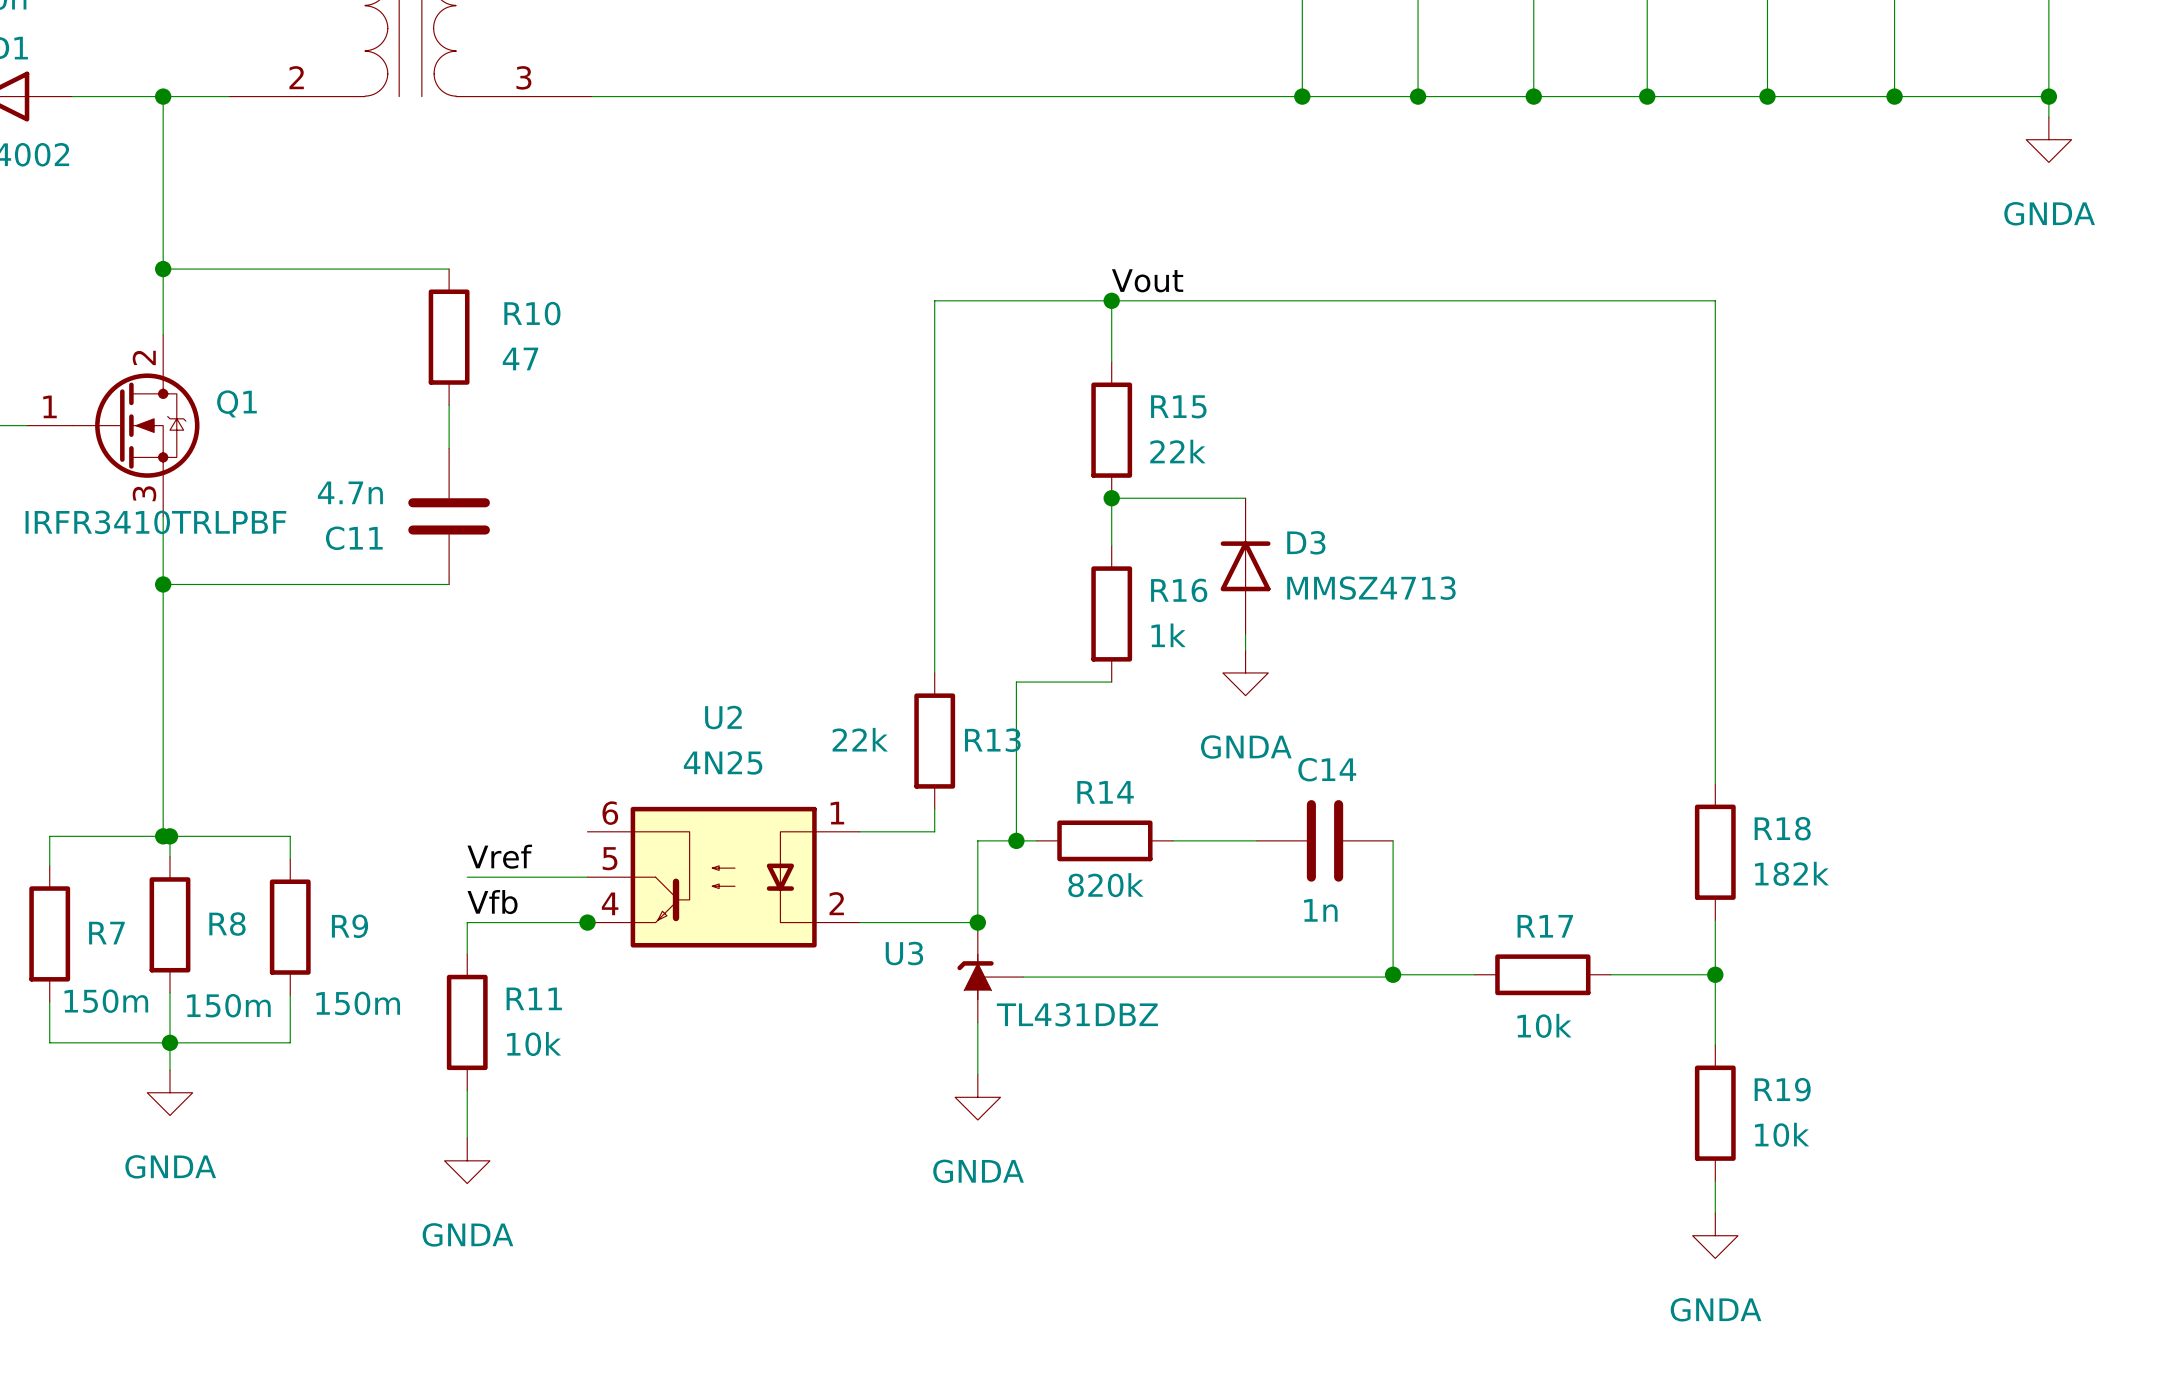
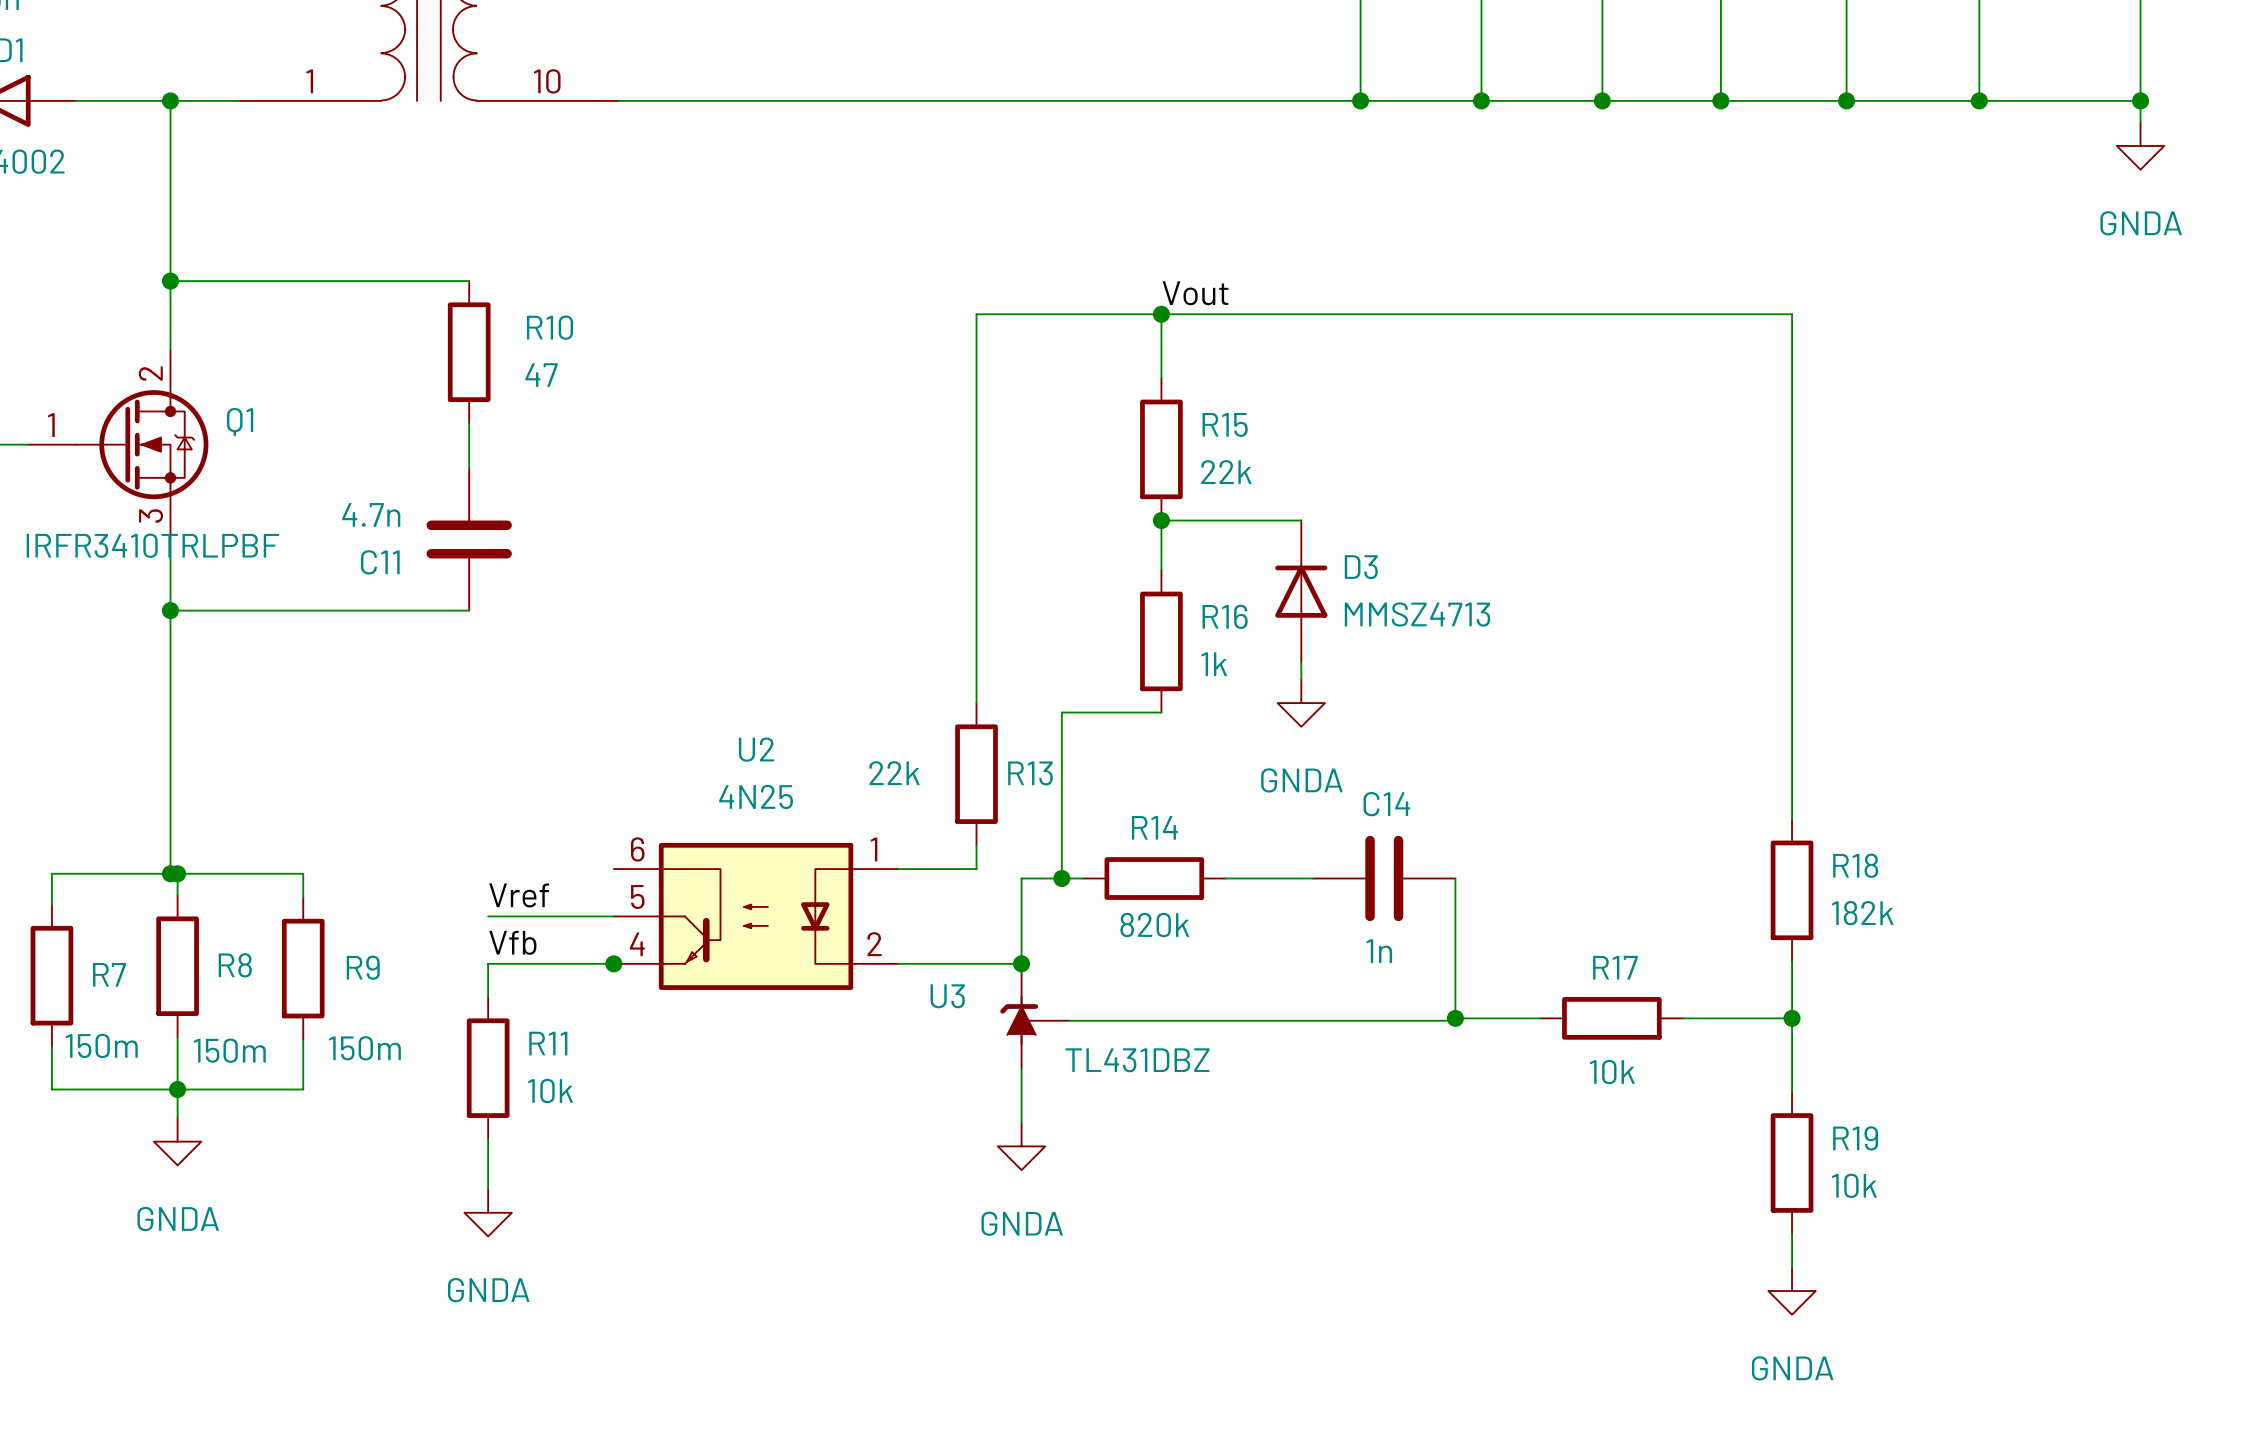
part pin number: 2 (296, 77) -> 1 (309, 81)
part pin number: 3 (523, 77) -> 10 (547, 81)

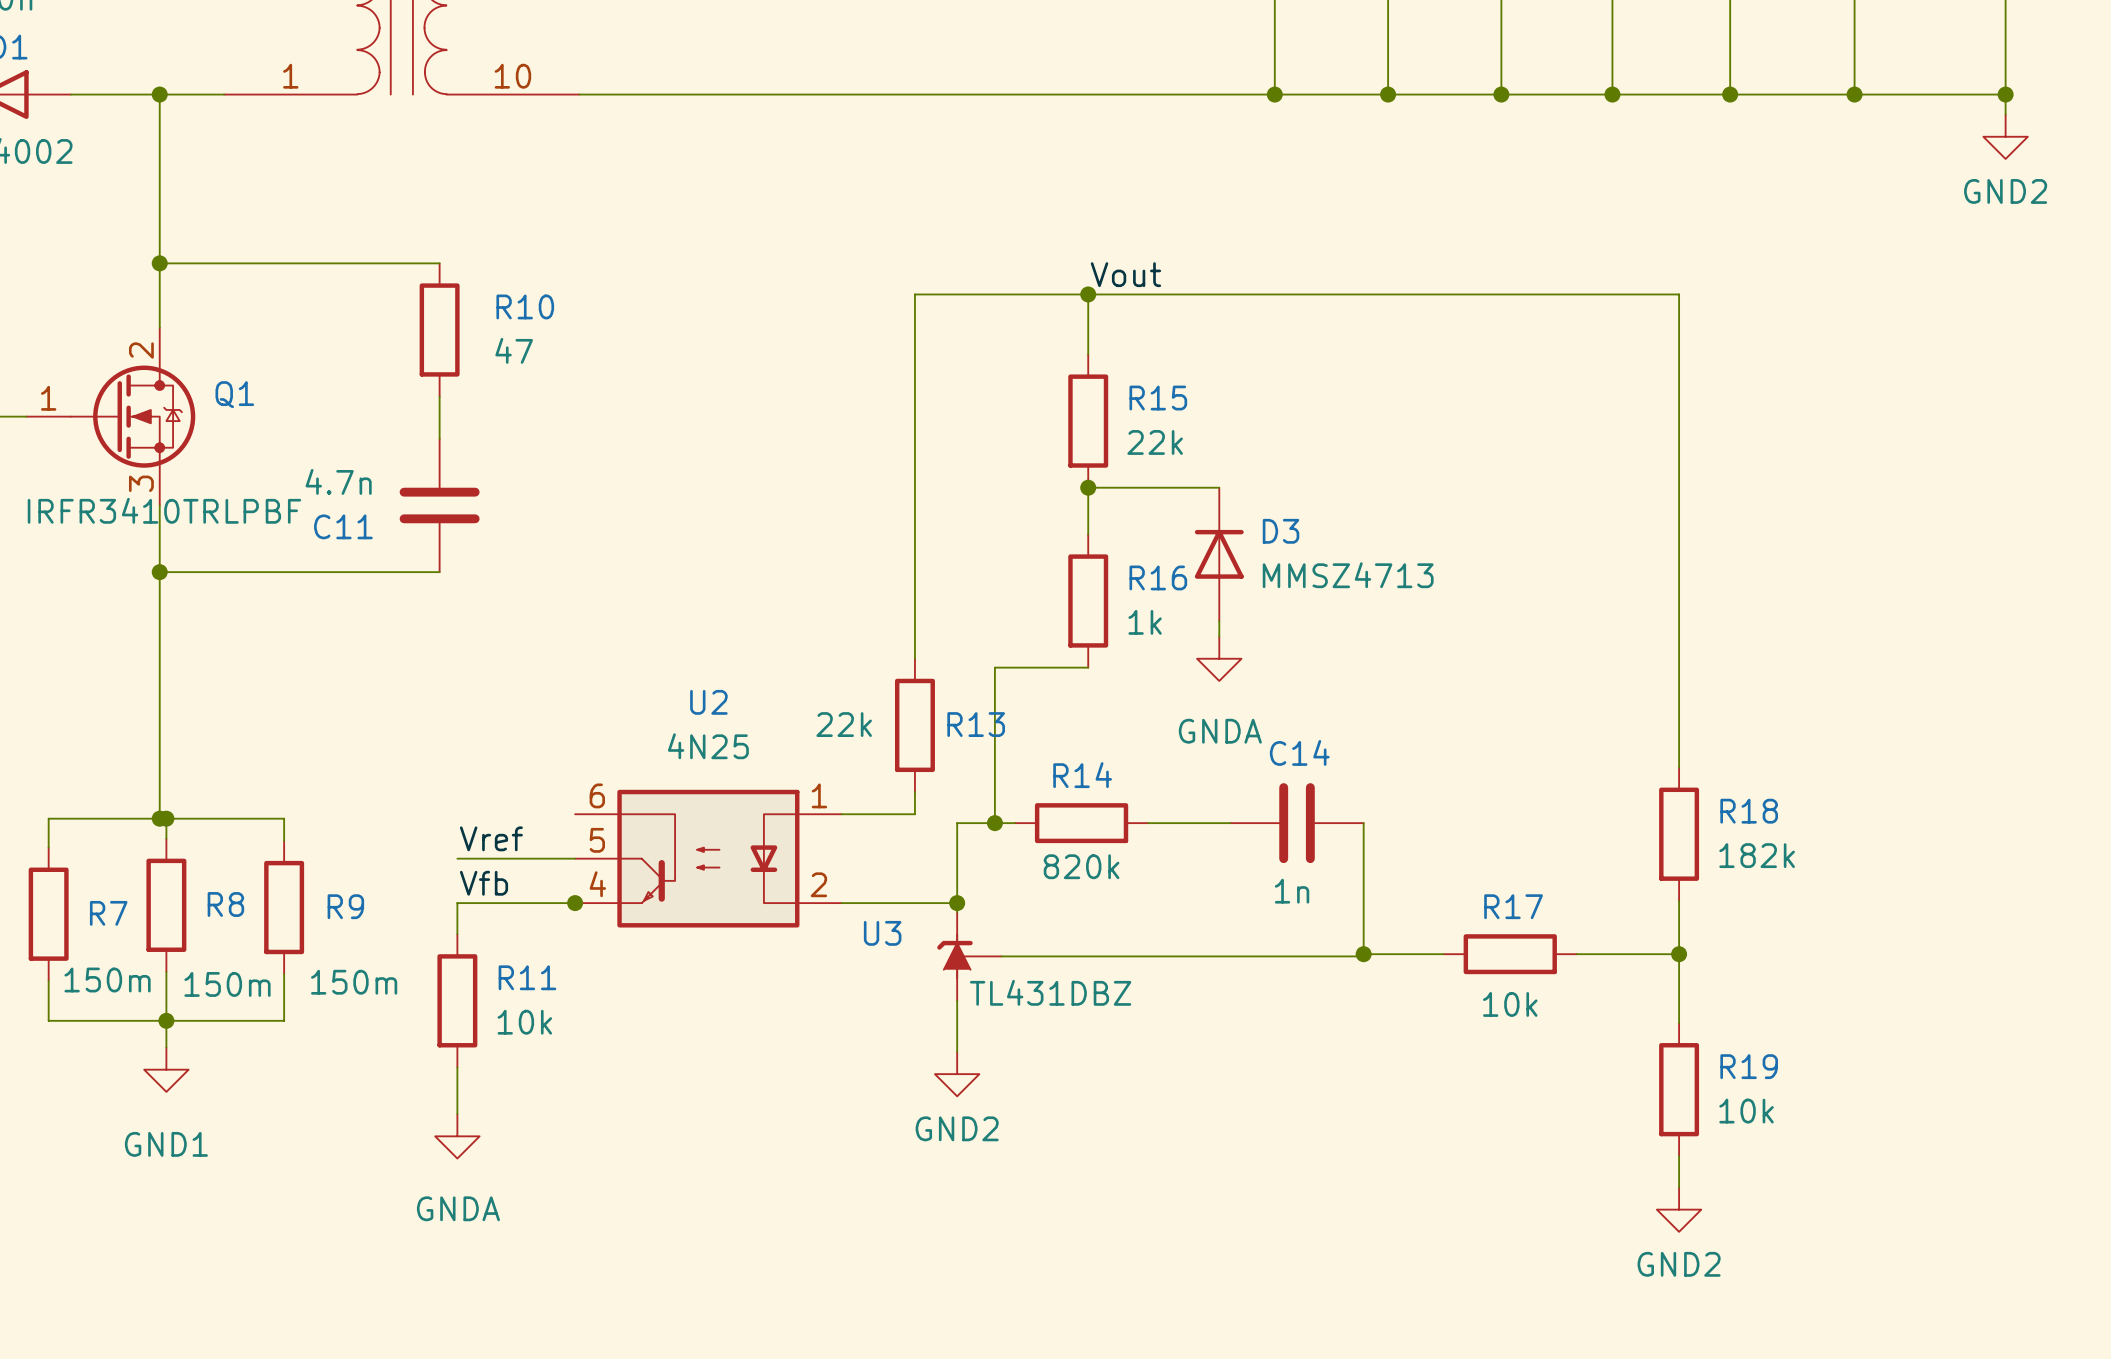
power symbol: GNDA (2140, 145) -> GND2 (2005, 136)
power symbol: GNDA (177, 1141) -> GND1 (166, 1069)
power symbol: GNDA (1021, 1146) -> GND2 (957, 1074)
power symbol: GNDA (1792, 1291) -> GND2 (1679, 1209)

